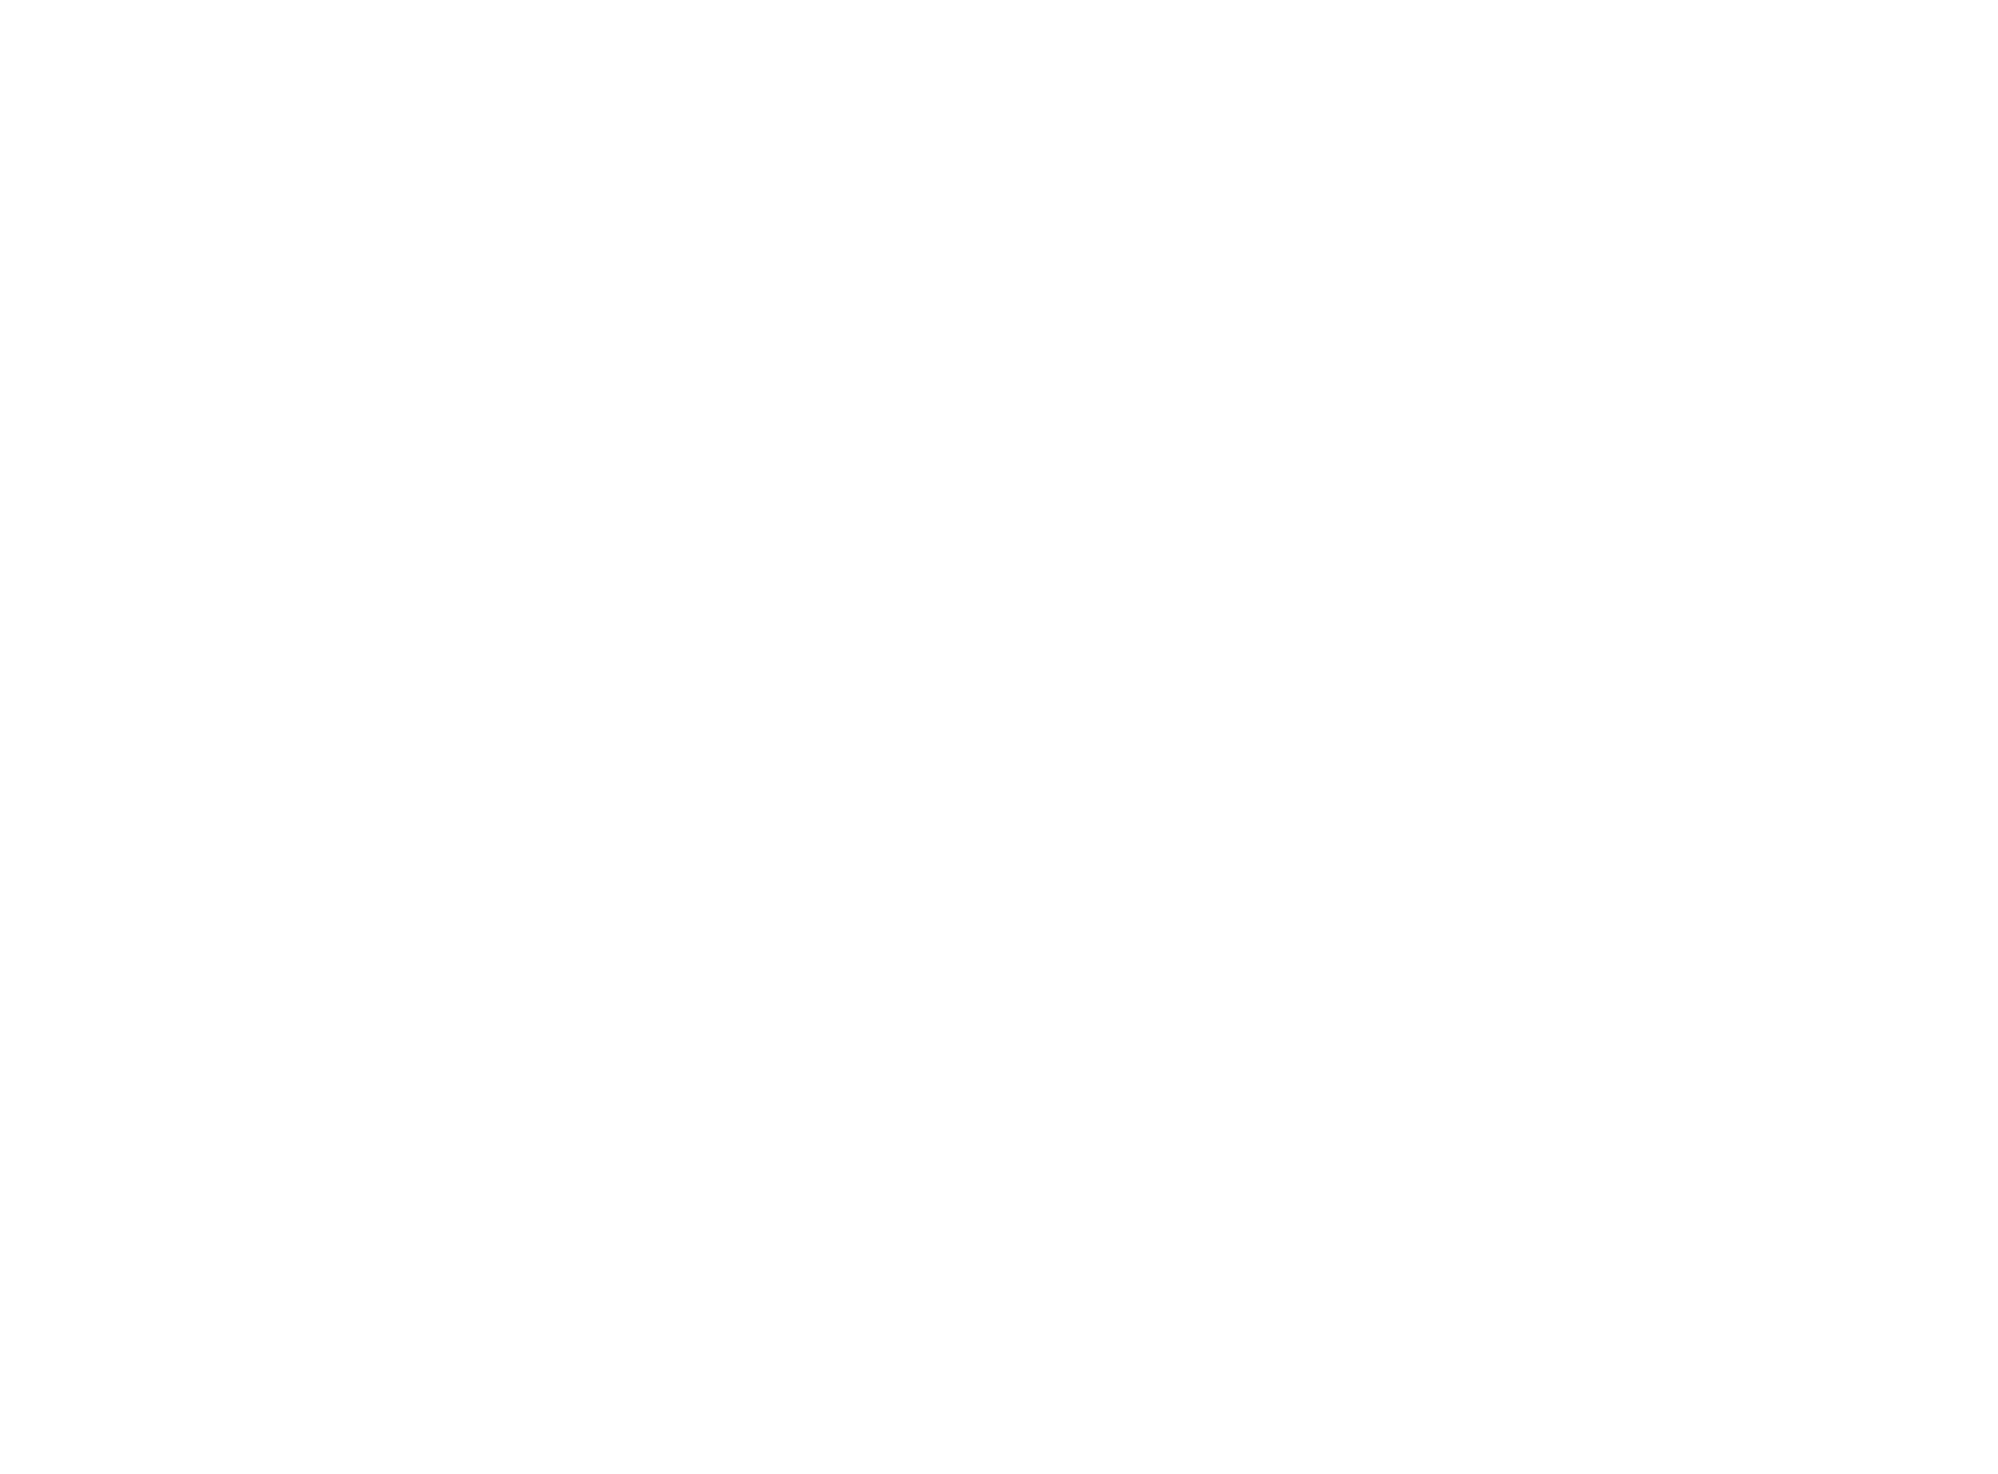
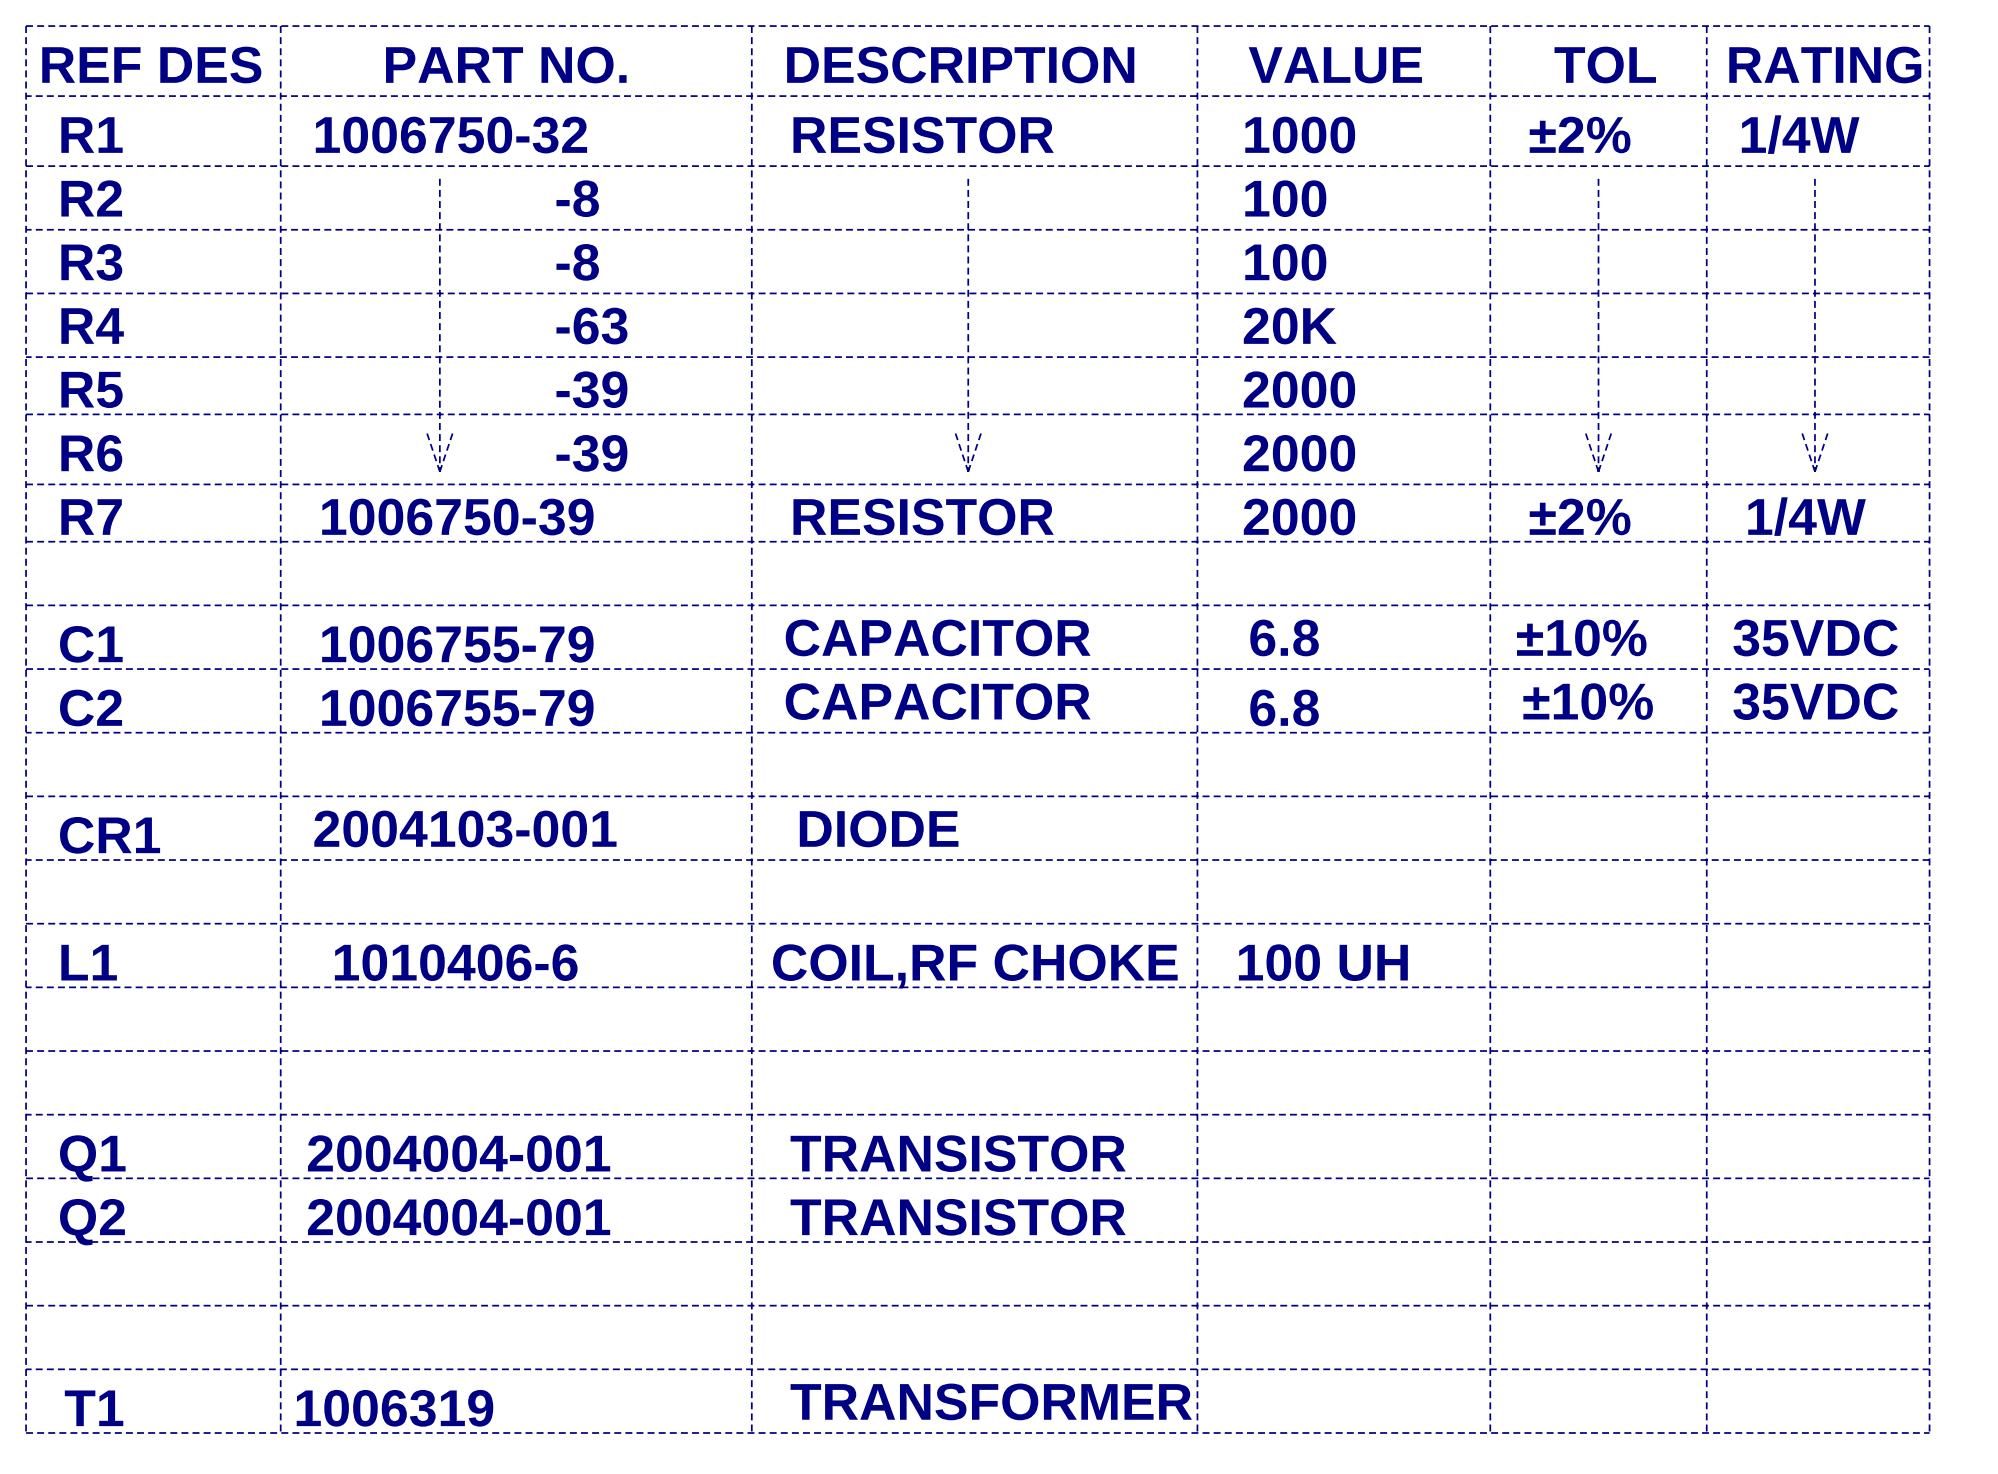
line: none -> (26, 26) (1929, 26) (1929, 1432) (26, 1432) (26, 26)
line: none -> (280, 26) (280, 1432)
line: none -> (751, 26) (751, 1432)
line: none -> (1197, 26) (1197, 1432)
line: none -> (1490, 26) (1490, 1432)
line: none -> (1706, 26) (1706, 1432)
text: none -> REF DES (151, 65)
text: none -> PART NO. (506, 65)
text: none -> DESCRIPTION (960, 65)
text: none -> VALUE (1335, 65)
text: none -> TOL (1605, 65)
text: none -> RATING (1825, 65)
line: none -> (26, 96) (1929, 96)
text: none -> R1 (92, 135)
text: none -> 1006750-32 (451, 135)
text: none -> RESISTOR (923, 135)
text: none -> 1000 (1300, 135)
text: none -> ±2% (1580, 134)
text: none -> 1/4W (1800, 134)
line: none -> (26, 166) (1929, 166)
line: none -> (439, 178) (439, 471)
line: none -> (968, 178) (968, 471)
line: none -> (1598, 178) (1598, 471)
line: none -> (1814, 178) (1814, 471)
text: none -> R2 (91, 198)
text: none -> -8 (577, 198)
text: none -> 100 (1285, 198)
line: none -> (26, 229) (1929, 229)
text: none -> R3 (91, 262)
text: none -> -8 (577, 262)
text: none -> 100 (1285, 262)
line: none -> (26, 293) (1929, 293)
text: none -> R4 (92, 326)
text: none -> -63 (591, 326)
text: none -> 20K (1290, 326)
line: none -> (26, 357) (1929, 357)
text: none -> -39 (591, 389)
text: none -> 2000 (1299, 389)
text: none -> R5 (92, 389)
line: none -> (26, 414) (1929, 414)
line: none -> (427, 433) (439, 471)
line: none -> (452, 433) (439, 471)
line: none -> (955, 433) (968, 471)
line: none -> (980, 433) (968, 471)
line: none -> (1585, 433) (1598, 471)
line: none -> (1611, 433) (1598, 471)
line: none -> (1802, 433) (1814, 471)
line: none -> (1827, 433) (1814, 471)
text: none -> R6 (91, 453)
text: none -> -39 (591, 453)
text: none -> 2000 (1299, 453)
line: none -> (26, 484) (1929, 484)
text: none -> R7 (91, 517)
text: none -> 1006750-39 (457, 517)
text: none -> RESISTOR (923, 517)
text: none -> 2000 (1299, 517)
text: none -> ±2% (1580, 516)
text: none -> 1/4W (1807, 516)
line: none -> (26, 541) (1929, 541)
line: none -> (26, 605) (1929, 605)
text: none -> CAPACITOR (938, 637)
text: none -> 6.8 (1284, 637)
text: none -> ±10% (1581, 637)
text: none -> 35VDC (1815, 638)
text: none -> C1 (91, 644)
text: none -> 1006755-79 (457, 644)
line: none -> (26, 669) (1929, 669)
text: none -> CAPACITOR (938, 701)
text: none -> ±10% (1588, 701)
text: none -> 35VDC (1815, 701)
text: none -> C2 (91, 707)
text: none -> 1006755-79 (457, 707)
text: none -> 6.8 (1284, 707)
line: none -> (26, 732) (1929, 732)
line: none -> (26, 796) (1929, 796)
text: none -> 2004103-001 (465, 828)
text: none -> DIODE (879, 828)
text: none -> CR1 (110, 835)
line: none -> (26, 860) (1929, 860)
line: none -> (26, 923) (1929, 923)
text: none -> L1 (89, 962)
text: none -> 1010406-6 (456, 962)
text: none -> 100 UH (1323, 962)
text: none -> COIL,RF CHOKE (975, 966)
line: none -> (26, 987) (1929, 987)
line: none -> (26, 1051) (1929, 1051)
line: none -> (26, 1114) (1929, 1114)
text: none -> 2004004-001 (459, 1153)
text: none -> TRANSISTOR (958, 1153)
text: none -> Q1 (92, 1158)
line: none -> (26, 1178) (1929, 1178)
text: none -> 2004004-001 (459, 1217)
text: none -> TRANSISTOR (958, 1217)
text: none -> Q2 (92, 1222)
line: none -> (26, 1242) (1929, 1242)
line: none -> (26, 1305) (1929, 1305)
line: none -> (26, 1369) (1929, 1369)
text: none -> TRANSFORMER (991, 1401)
text: none -> T1 (94, 1408)
text: none -> 1006319 (394, 1408)

